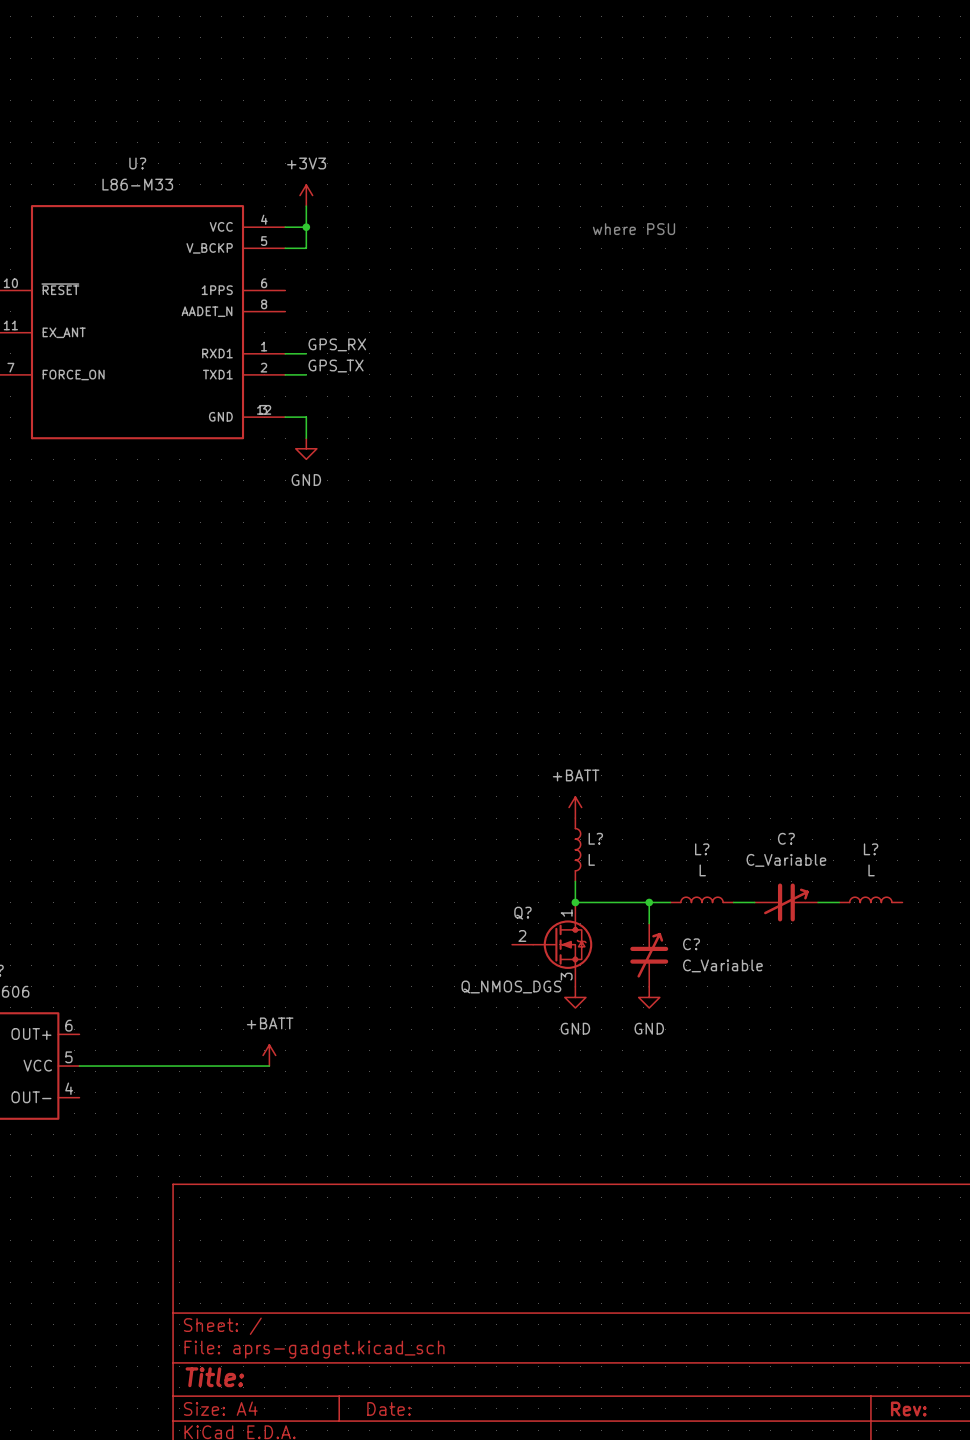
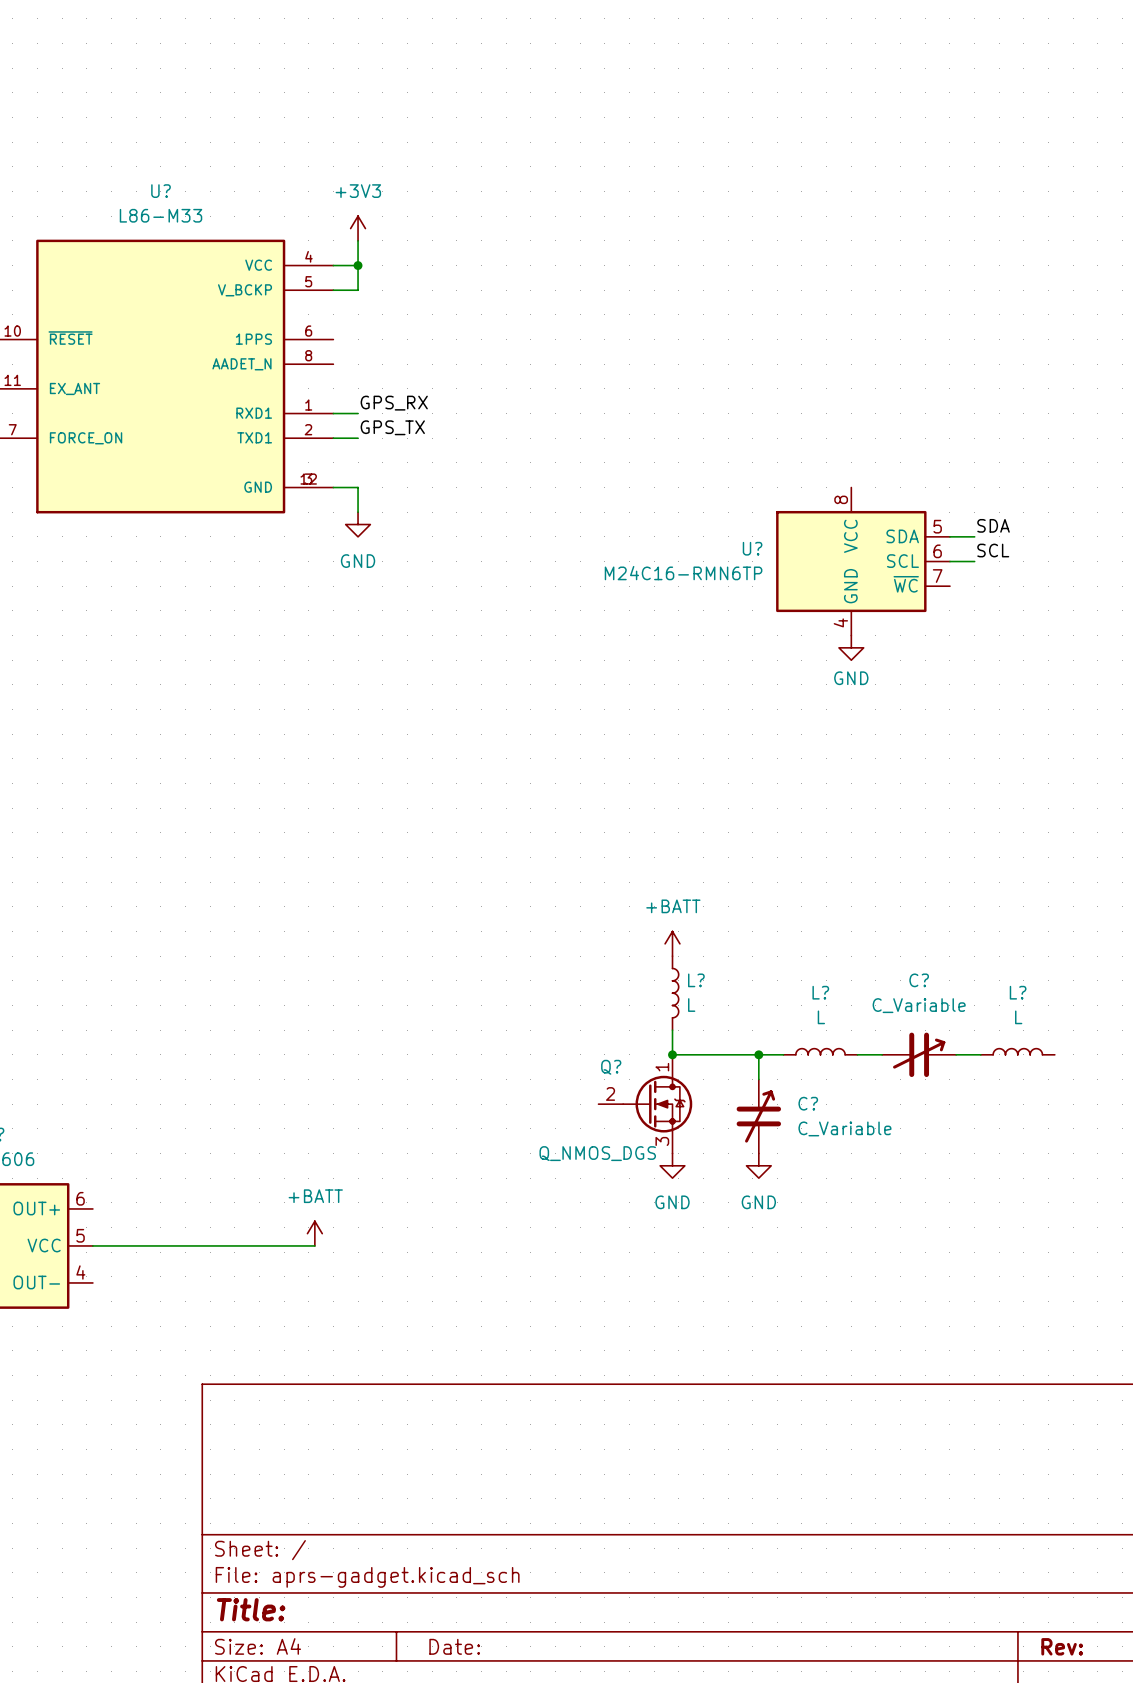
text: where PSU (633, 229) -> none
label: none -> SDA (993, 525)
wire: none -> (949, 536) (974, 536)
label: none -> SCL (993, 550)
U?: none -> M24C16-RMN6TP (863, 561)
wire: none -> (949, 561) (974, 561)
power symbol: none -> GND (851, 647)

